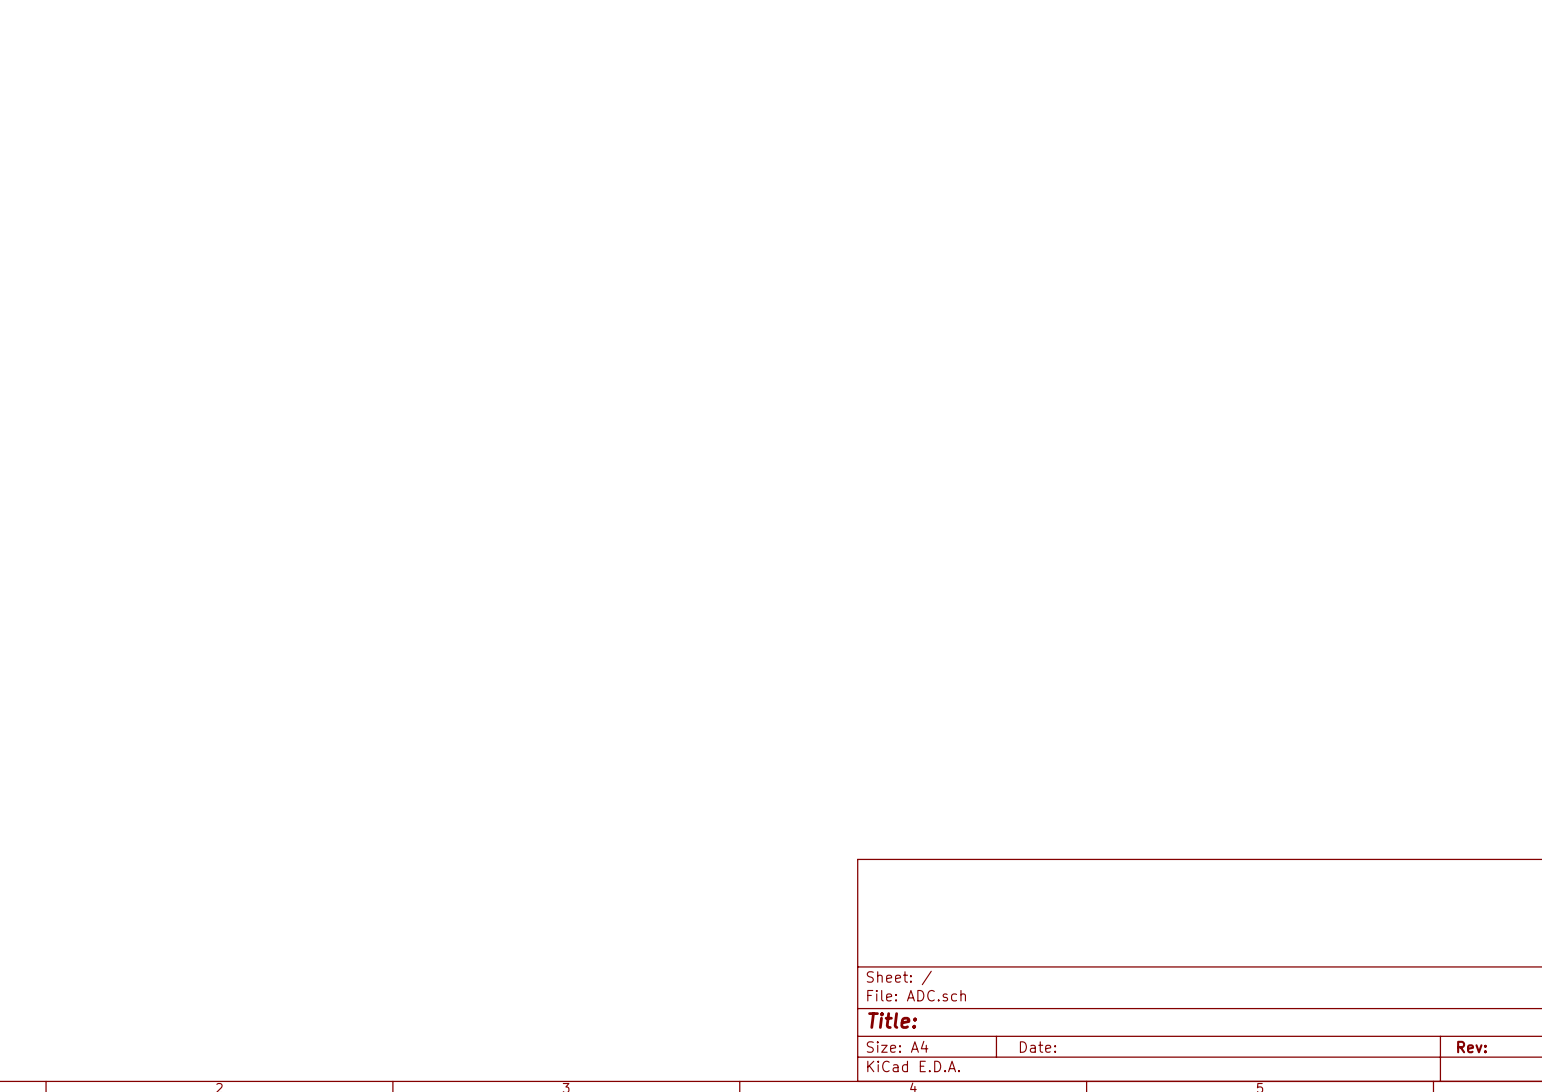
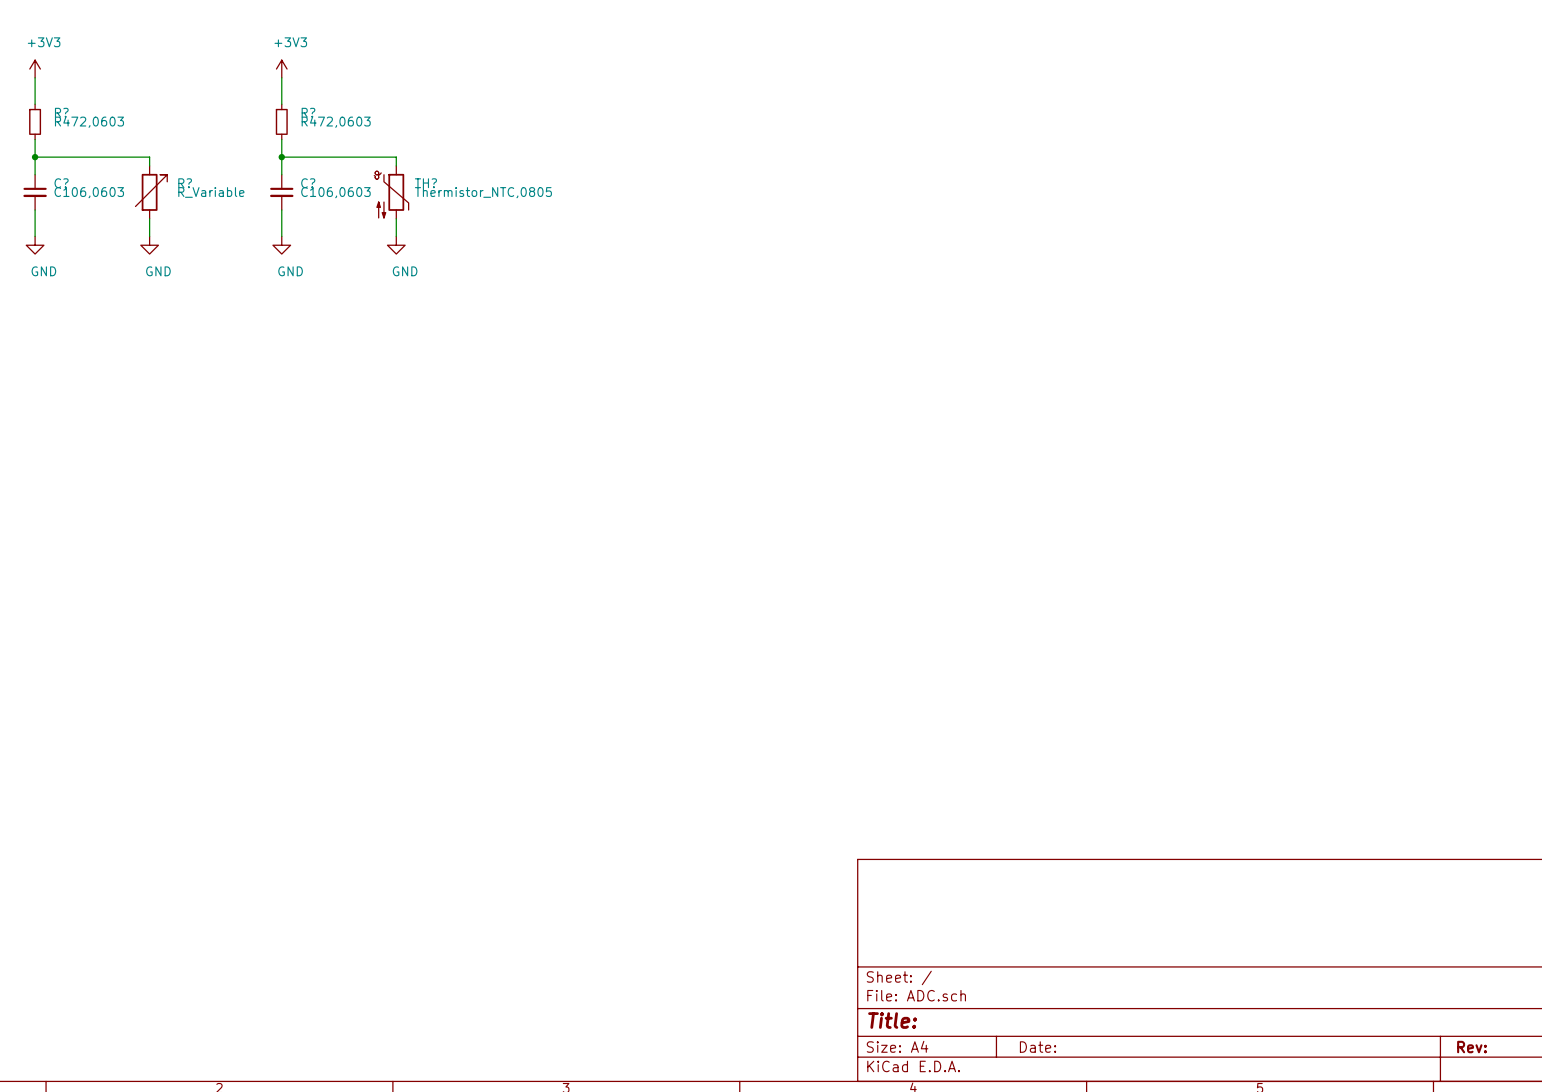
power symbol: none -> +3V3 (35, 69)
power symbol: none -> +3V3 (281, 69)
wire: none -> (35, 77) (35, 104)
wire: none -> (281, 77) (281, 104)
R?: none -> R472,0603 (35, 121)
R?: none -> R472,0603 (281, 121)
wire: none -> (35, 139) (35, 174)
wire: none -> (281, 139) (281, 174)
wire: none -> (35, 157) (149, 157) (149, 165)
junction: none -> (35, 157)
wire: none -> (281, 157) (396, 157) (396, 165)
junction: none -> (281, 157)
C?: none -> C106,0603 (35, 192)
R?: none -> R_Variable (151, 192)
C?: none -> C106,0603 (281, 192)
TH?: none -> Thermistor_NTC,0805 (391, 192)
wire: none -> (35, 209) (35, 236)
wire: none -> (281, 209) (281, 236)
wire: none -> (149, 218) (149, 236)
wire: none -> (396, 218) (396, 236)
power symbol: none -> GND (35, 245)
power symbol: none -> GND (149, 245)
power symbol: none -> GND (281, 245)
power symbol: none -> GND (396, 245)

